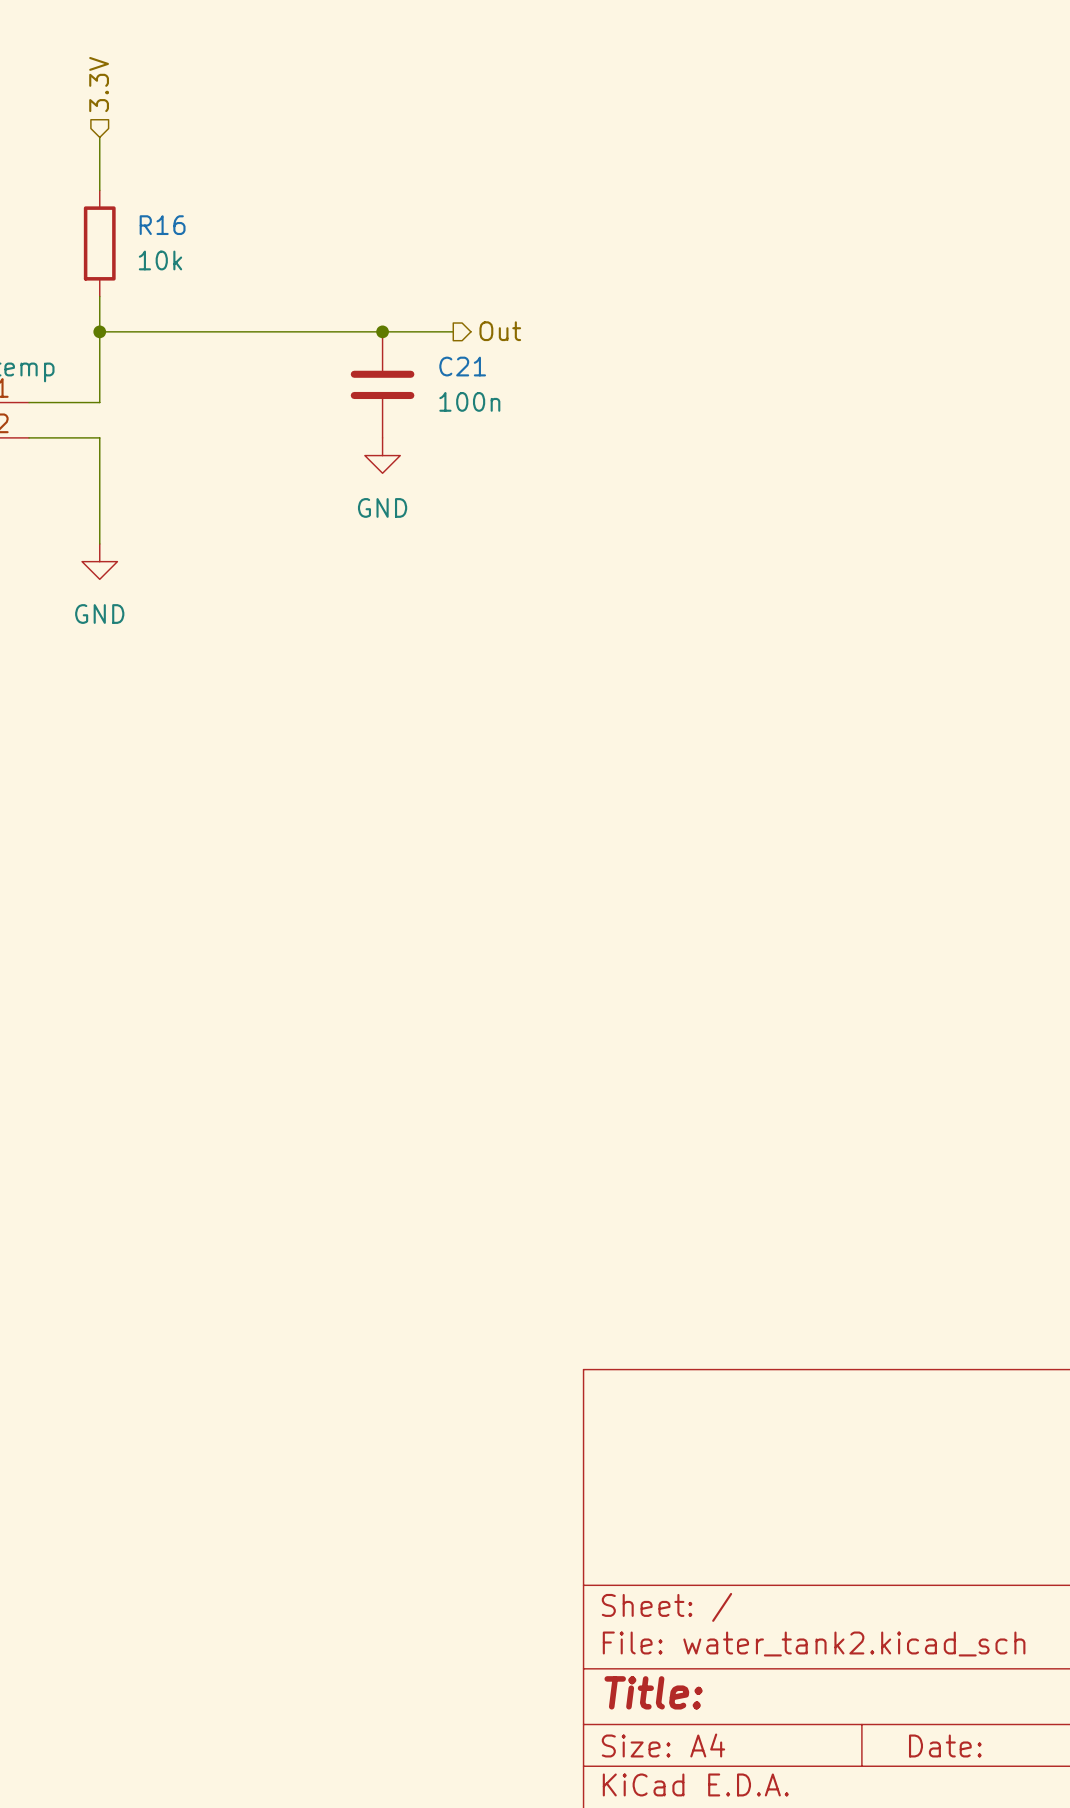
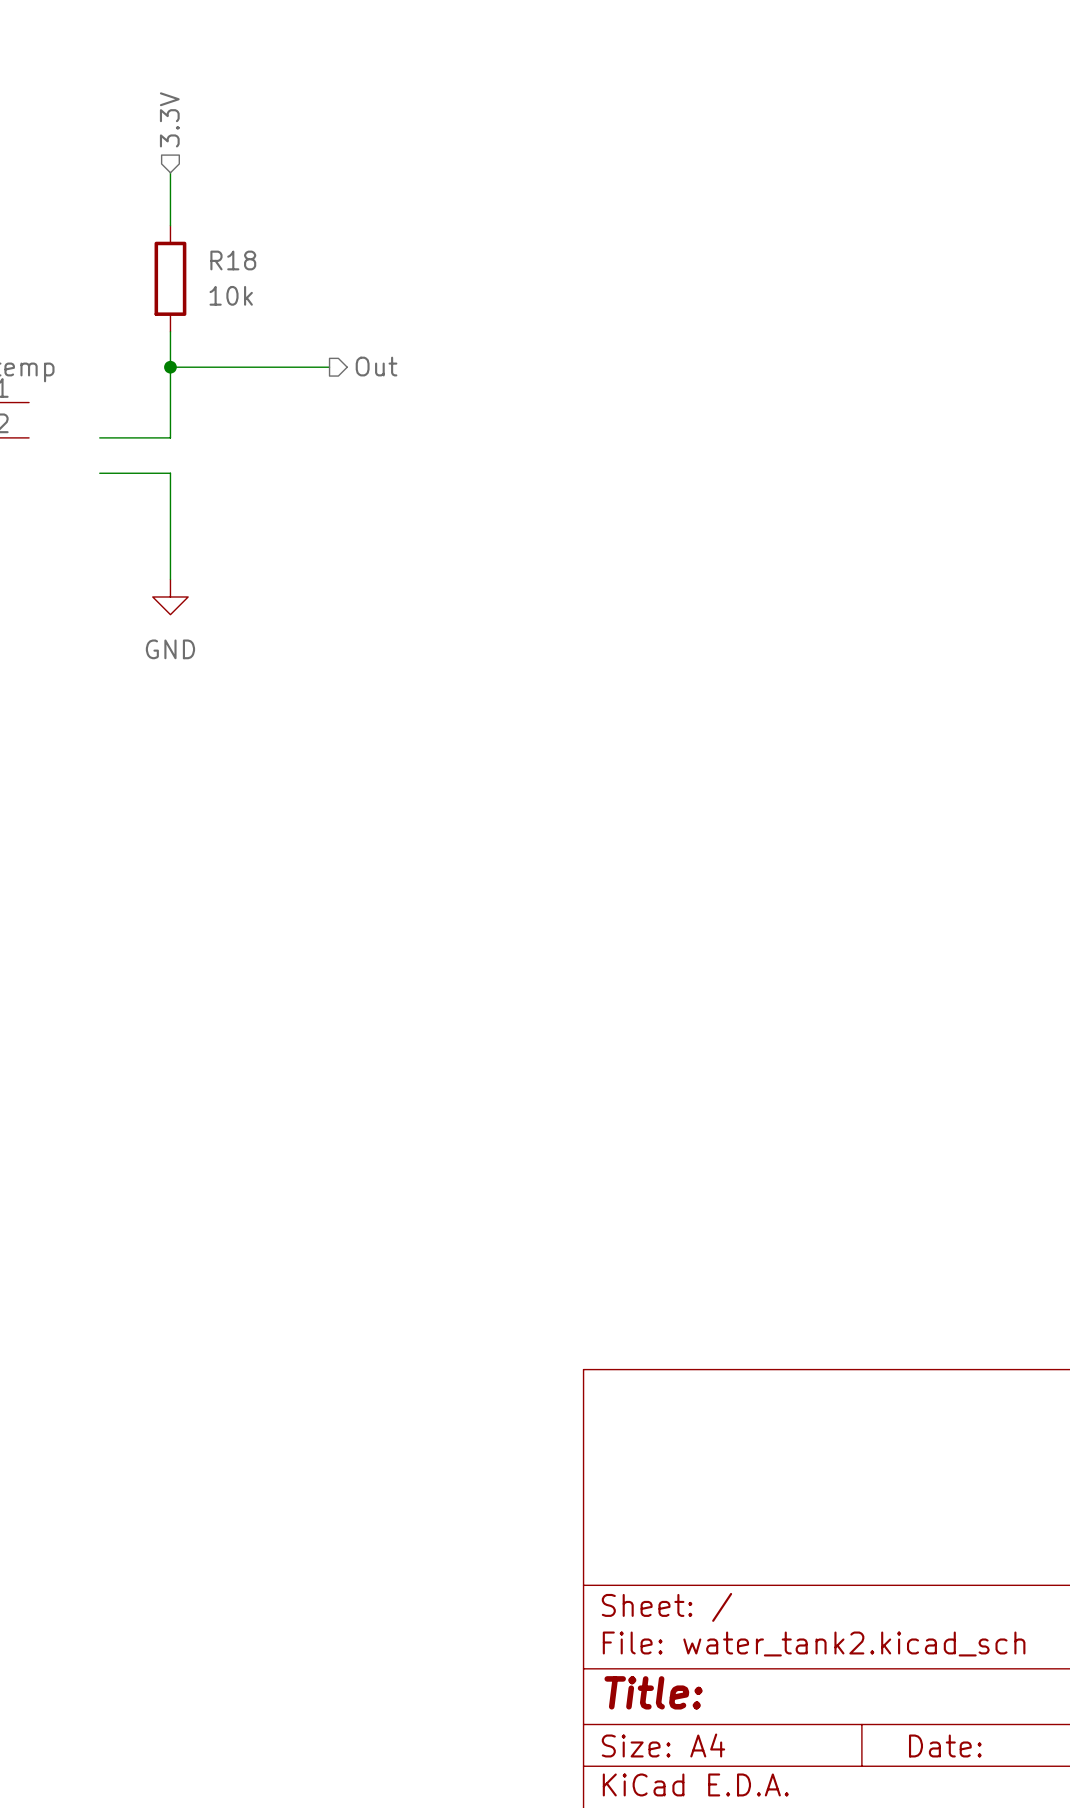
hierarchical label position: 3.3V (99, 84) -> 3.3V (169, 119)
wire: (99, 137) (99, 190) -> (170, 172) (170, 225)
R16: 10k (99, 243) -> none
R18: none -> 10k (170, 278)
wire: (99, 296) (99, 402) (29, 402) -> (170, 331) (170, 437) (99, 437)
wire: (99, 331) (453, 331) -> none
junction position: (99, 331) -> (170, 367)
junction: (382, 331) -> none
hierarchical label position: Out (500, 331) -> Out (376, 366)
wire: none -> (170, 367) (329, 367)
C21: 100n (382, 384) -> none
wire: (29, 437) (99, 437) (99, 543) -> (99, 473) (170, 473) (170, 579)
power symbol: GND (382, 455) -> none
power symbol position: GND (99, 561) -> GND (170, 596)

